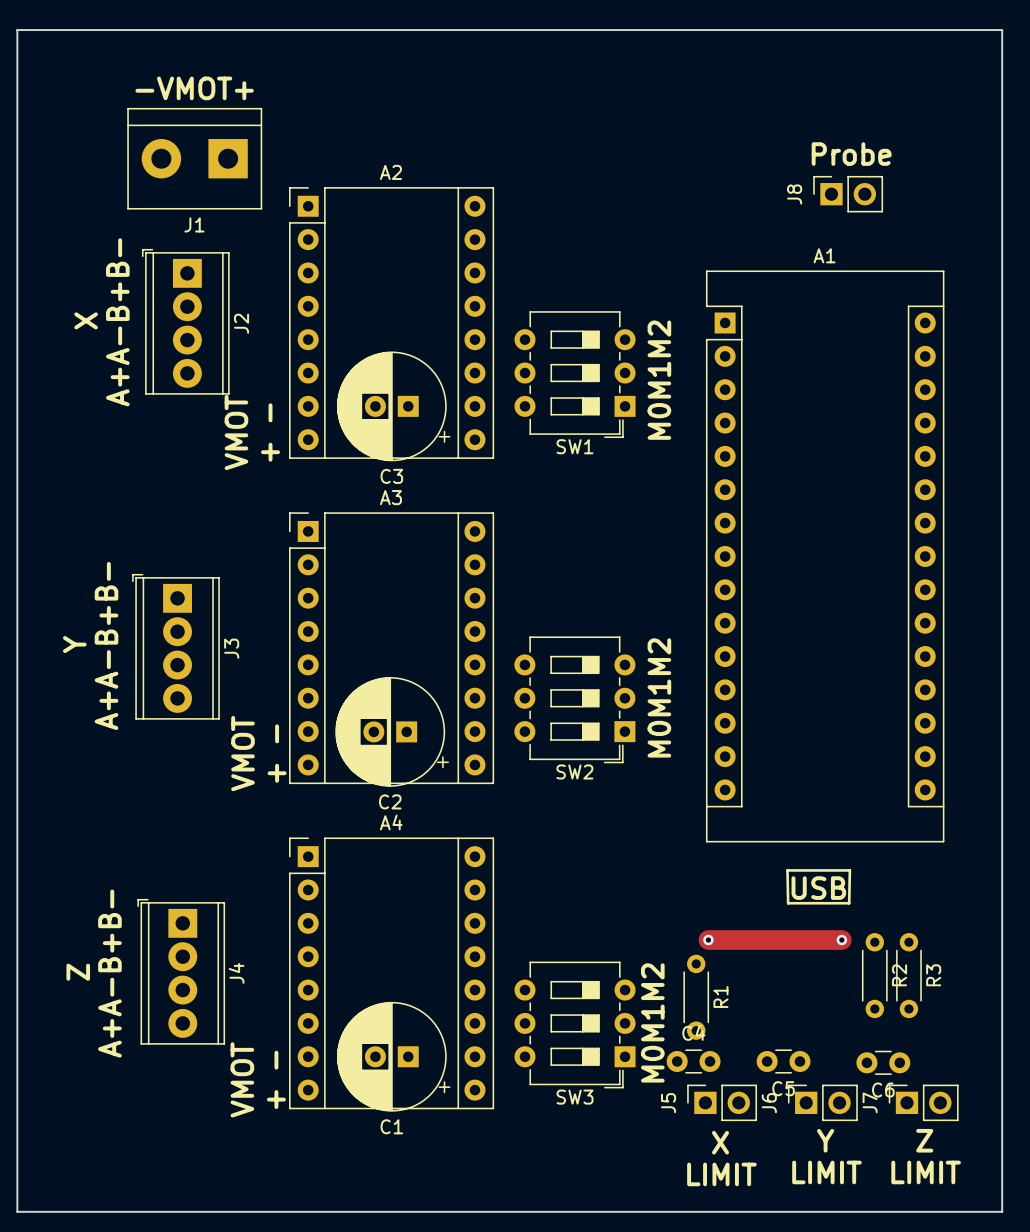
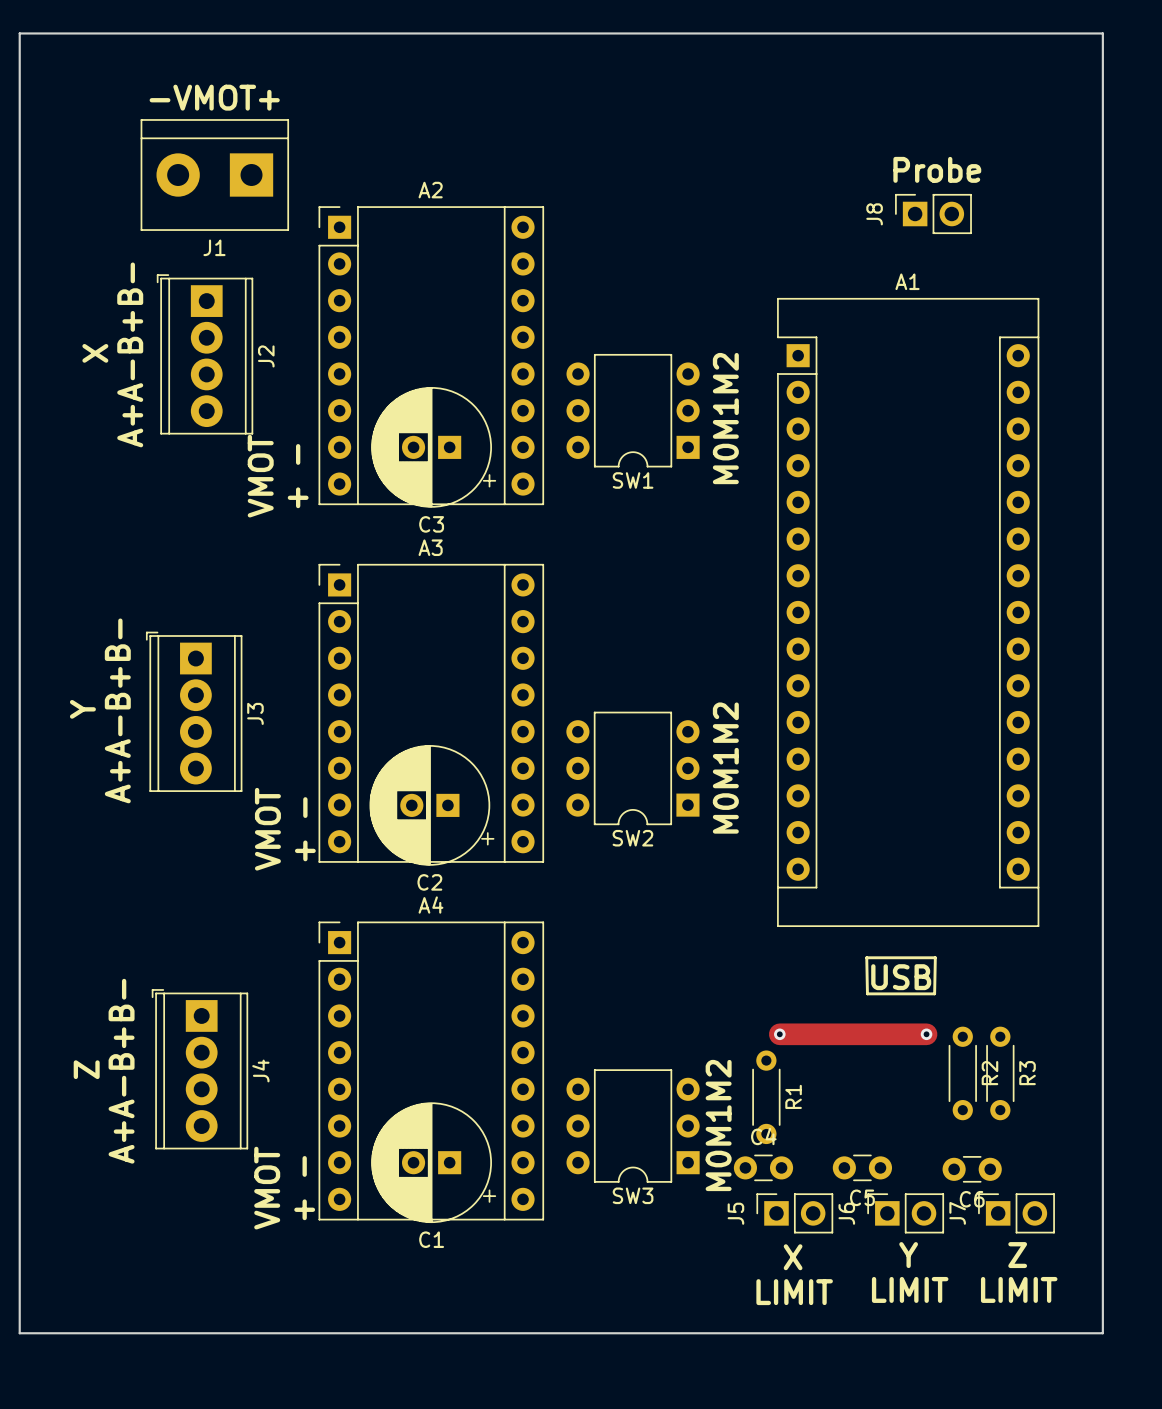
SW1 footprint: [514, 311, 636, 439] -> [566, 353, 700, 468]
SW2 footprint: [514, 636, 636, 764] -> [566, 711, 700, 826]
SW3 footprint: [514, 961, 636, 1089] -> [566, 1069, 700, 1183]

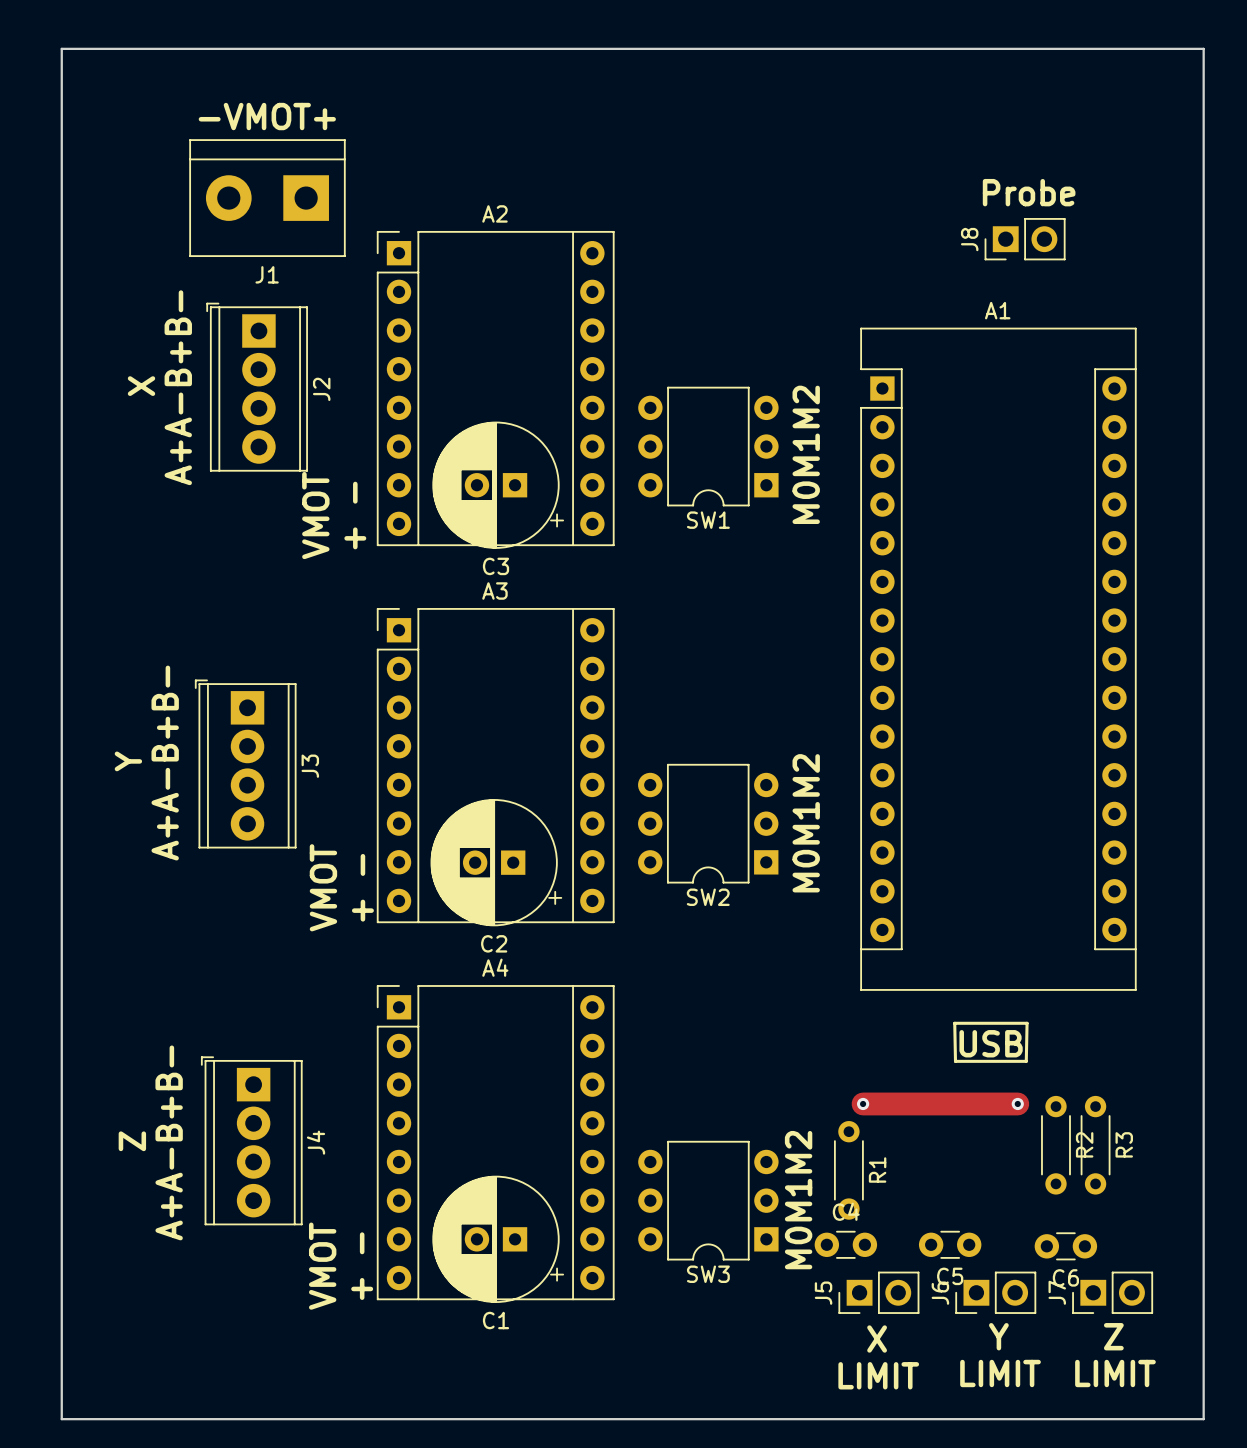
J8 footprint: [895, 193, 972, 235] -> [984, 218, 1066, 261]
J5 footprint: [756, 1193, 834, 1234] -> [838, 1271, 920, 1314]
J6 footprint: [867, 1193, 945, 1234] -> [955, 1271, 1037, 1314]
J7 footprint: [978, 1193, 1055, 1234] -> [1072, 1271, 1154, 1314]

